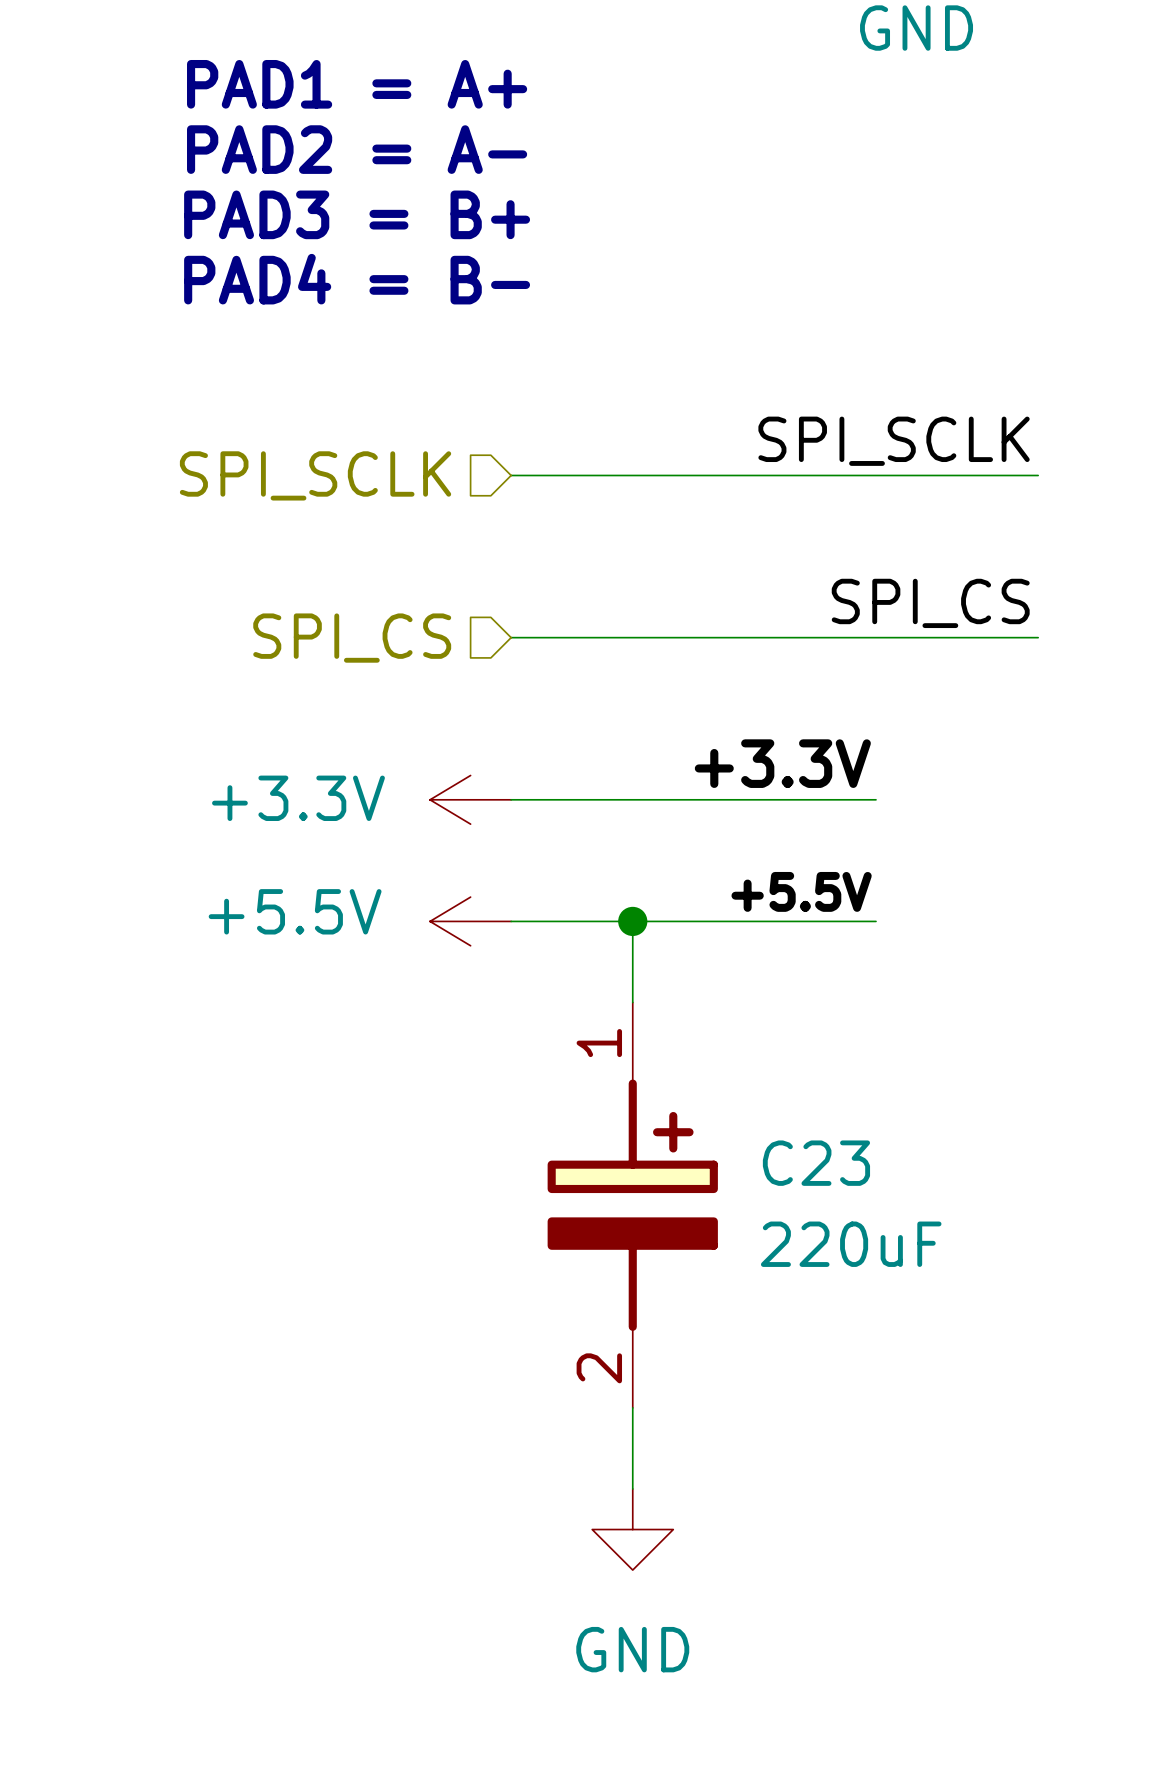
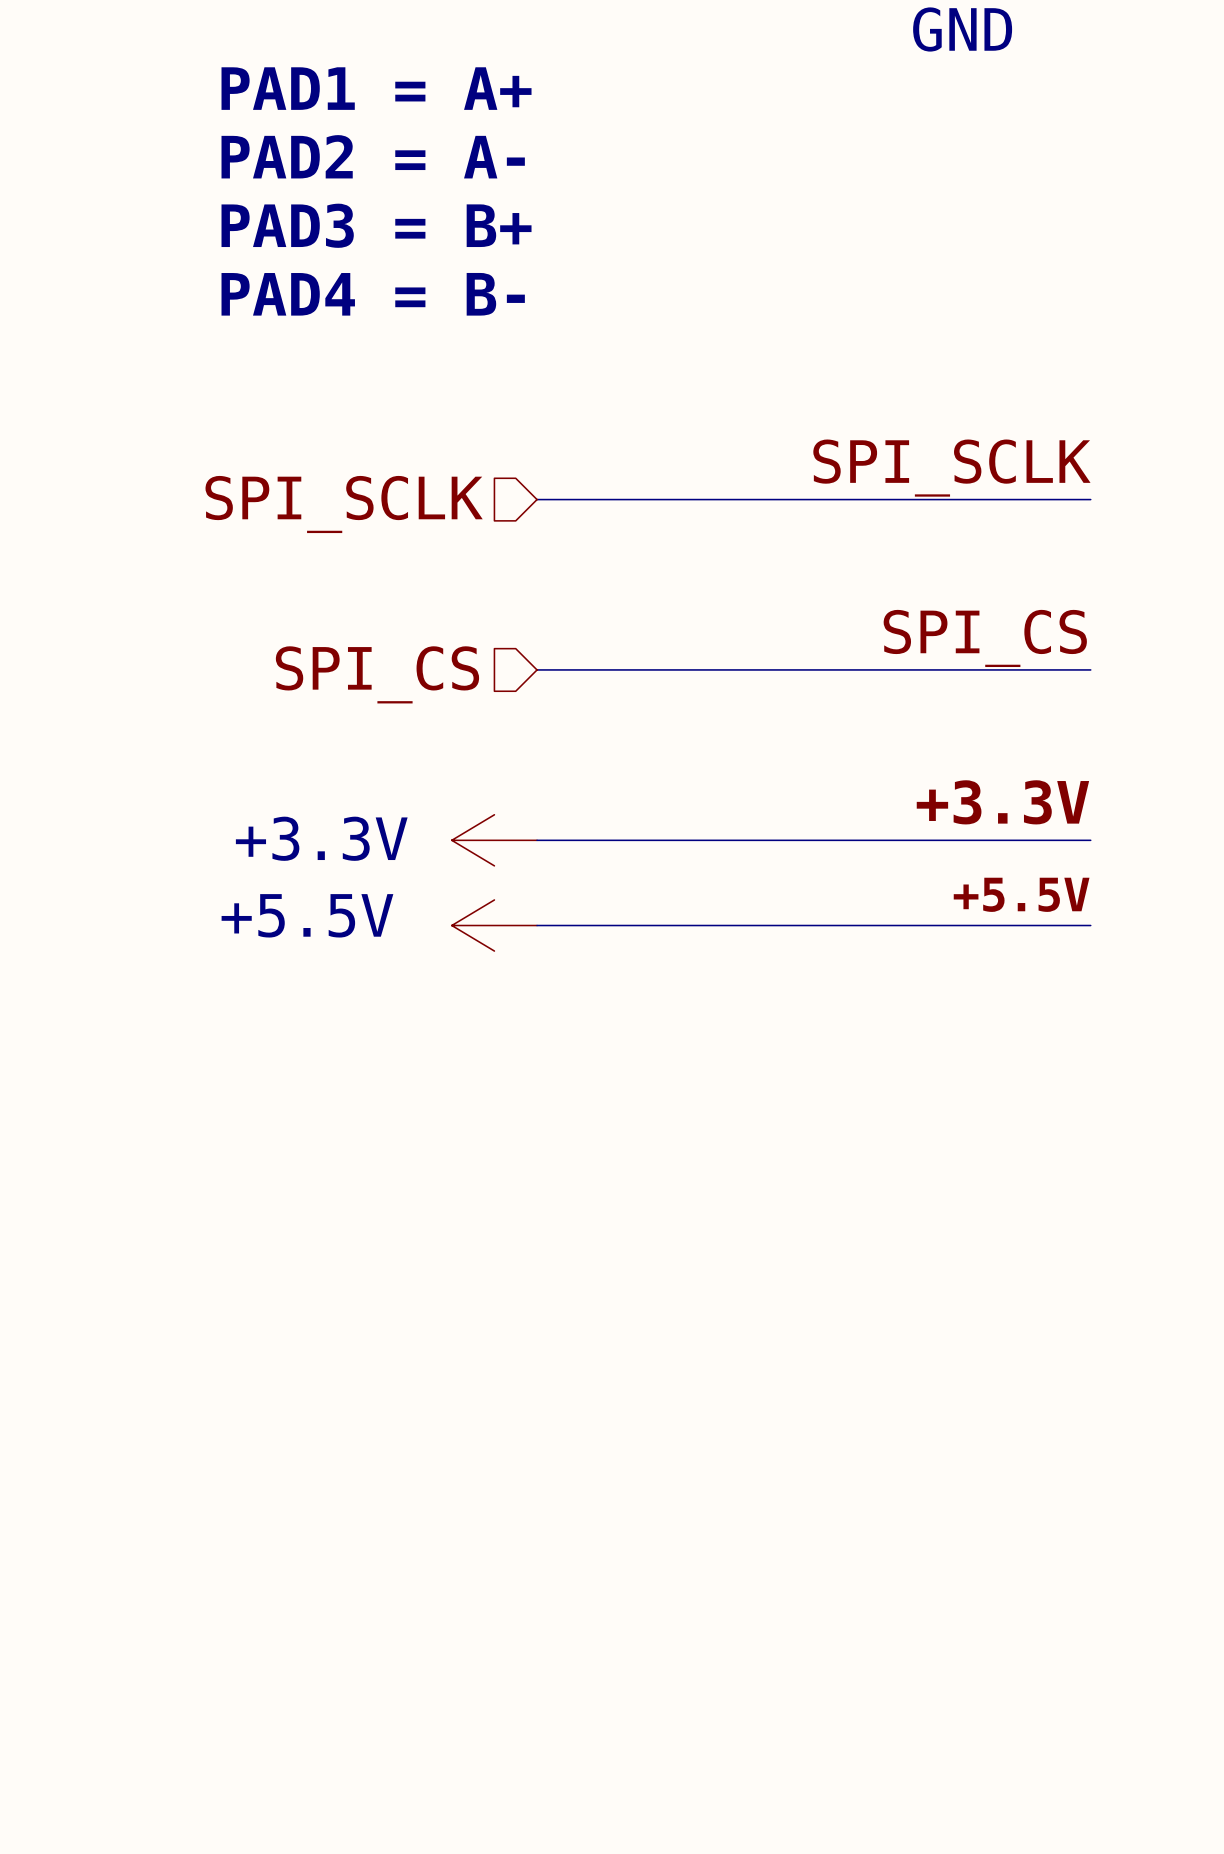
label position: +3.3V (782, 763) -> +3.3V (1002, 802)
wire: none -> (920, 840) (1090, 840)
wire: none -> (537, 925) (1090, 925)
label position: +5.5V (801, 891) -> +5.5V (1021, 894)
power symbol position: +5.5V (470, 921) -> +5.5V (494, 925)
wire: (511, 921) (875, 921) -> none
wire: (632, 921) (632, 1002) -> none
junction: (632, 921) -> none
C23: 220uF (632, 1205) -> none
wire: (632, 1407) (632, 1488) -> none
power symbol: GND (632, 1529) -> none

